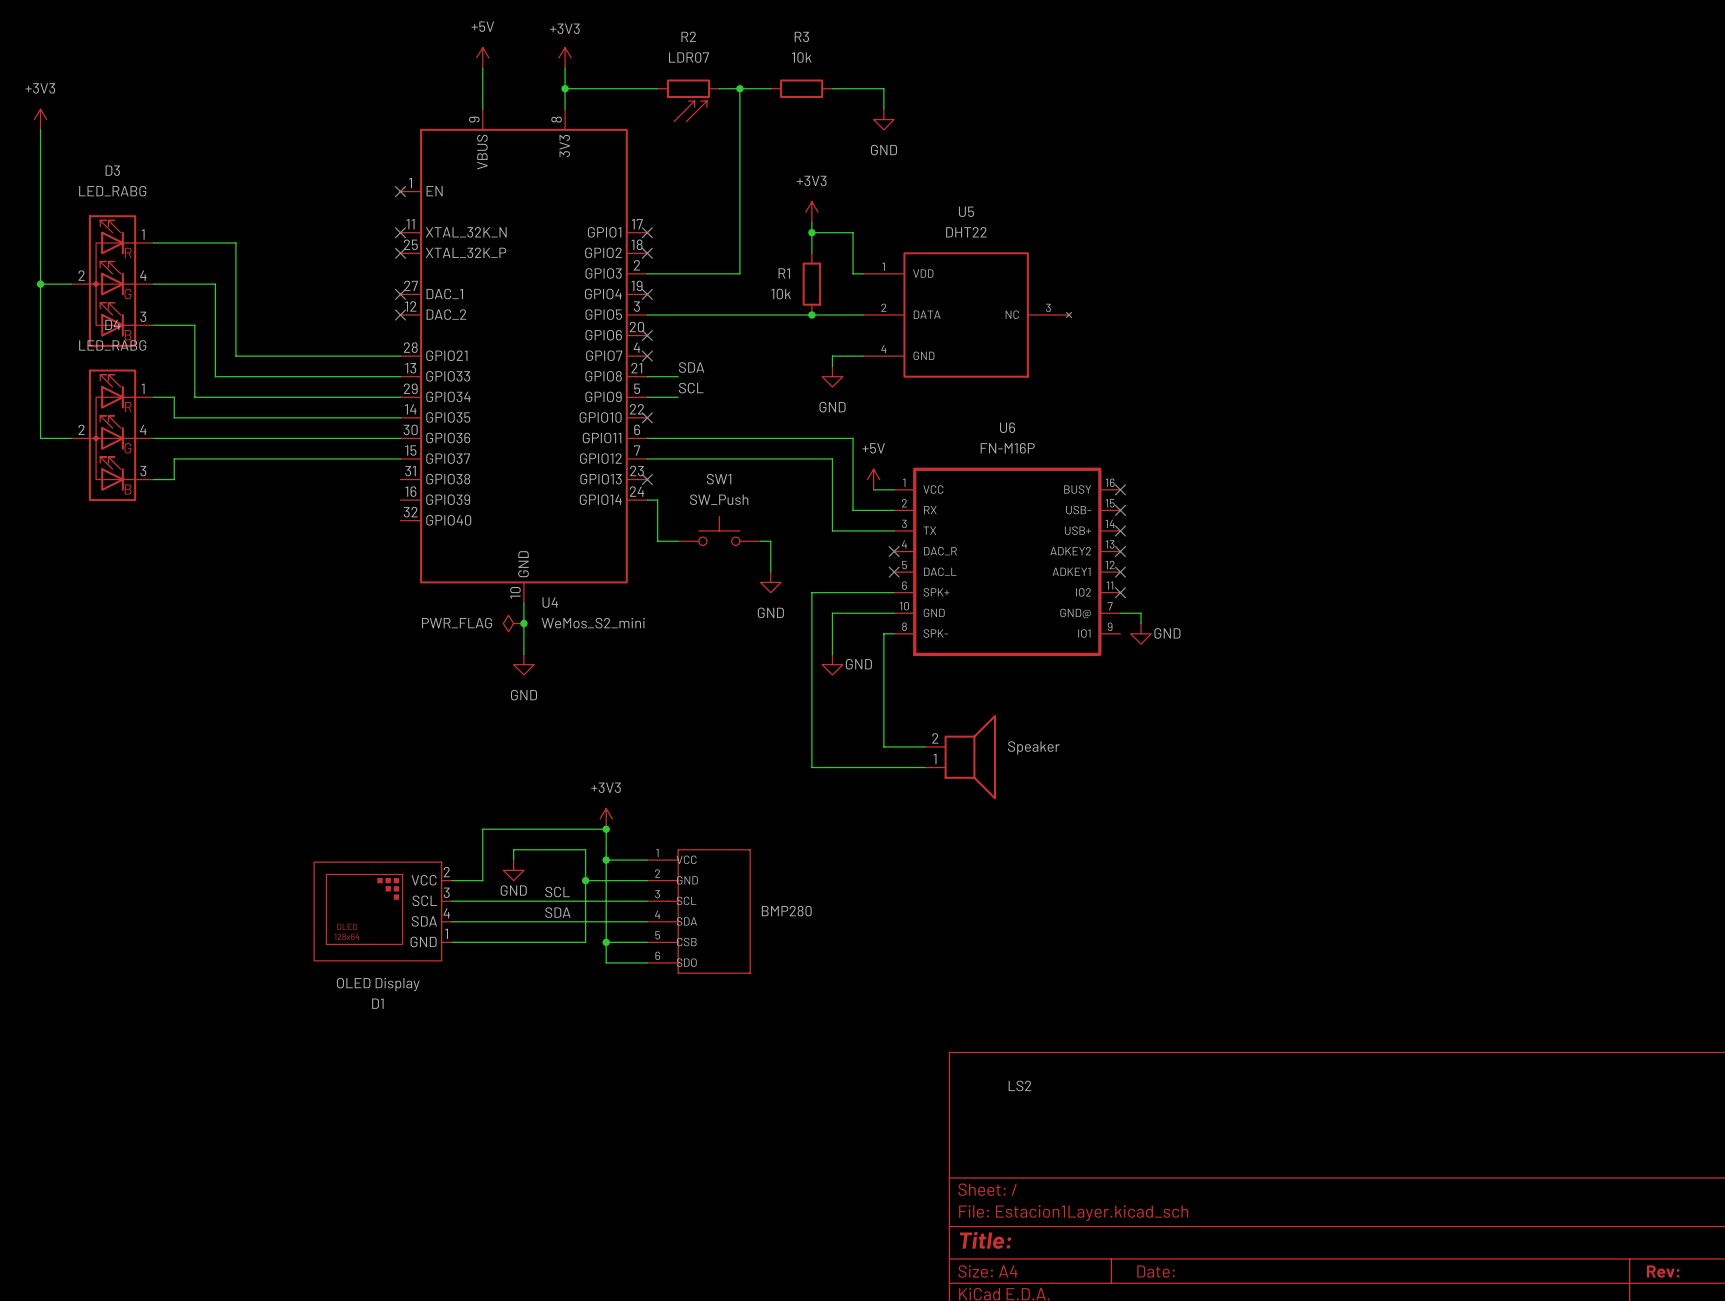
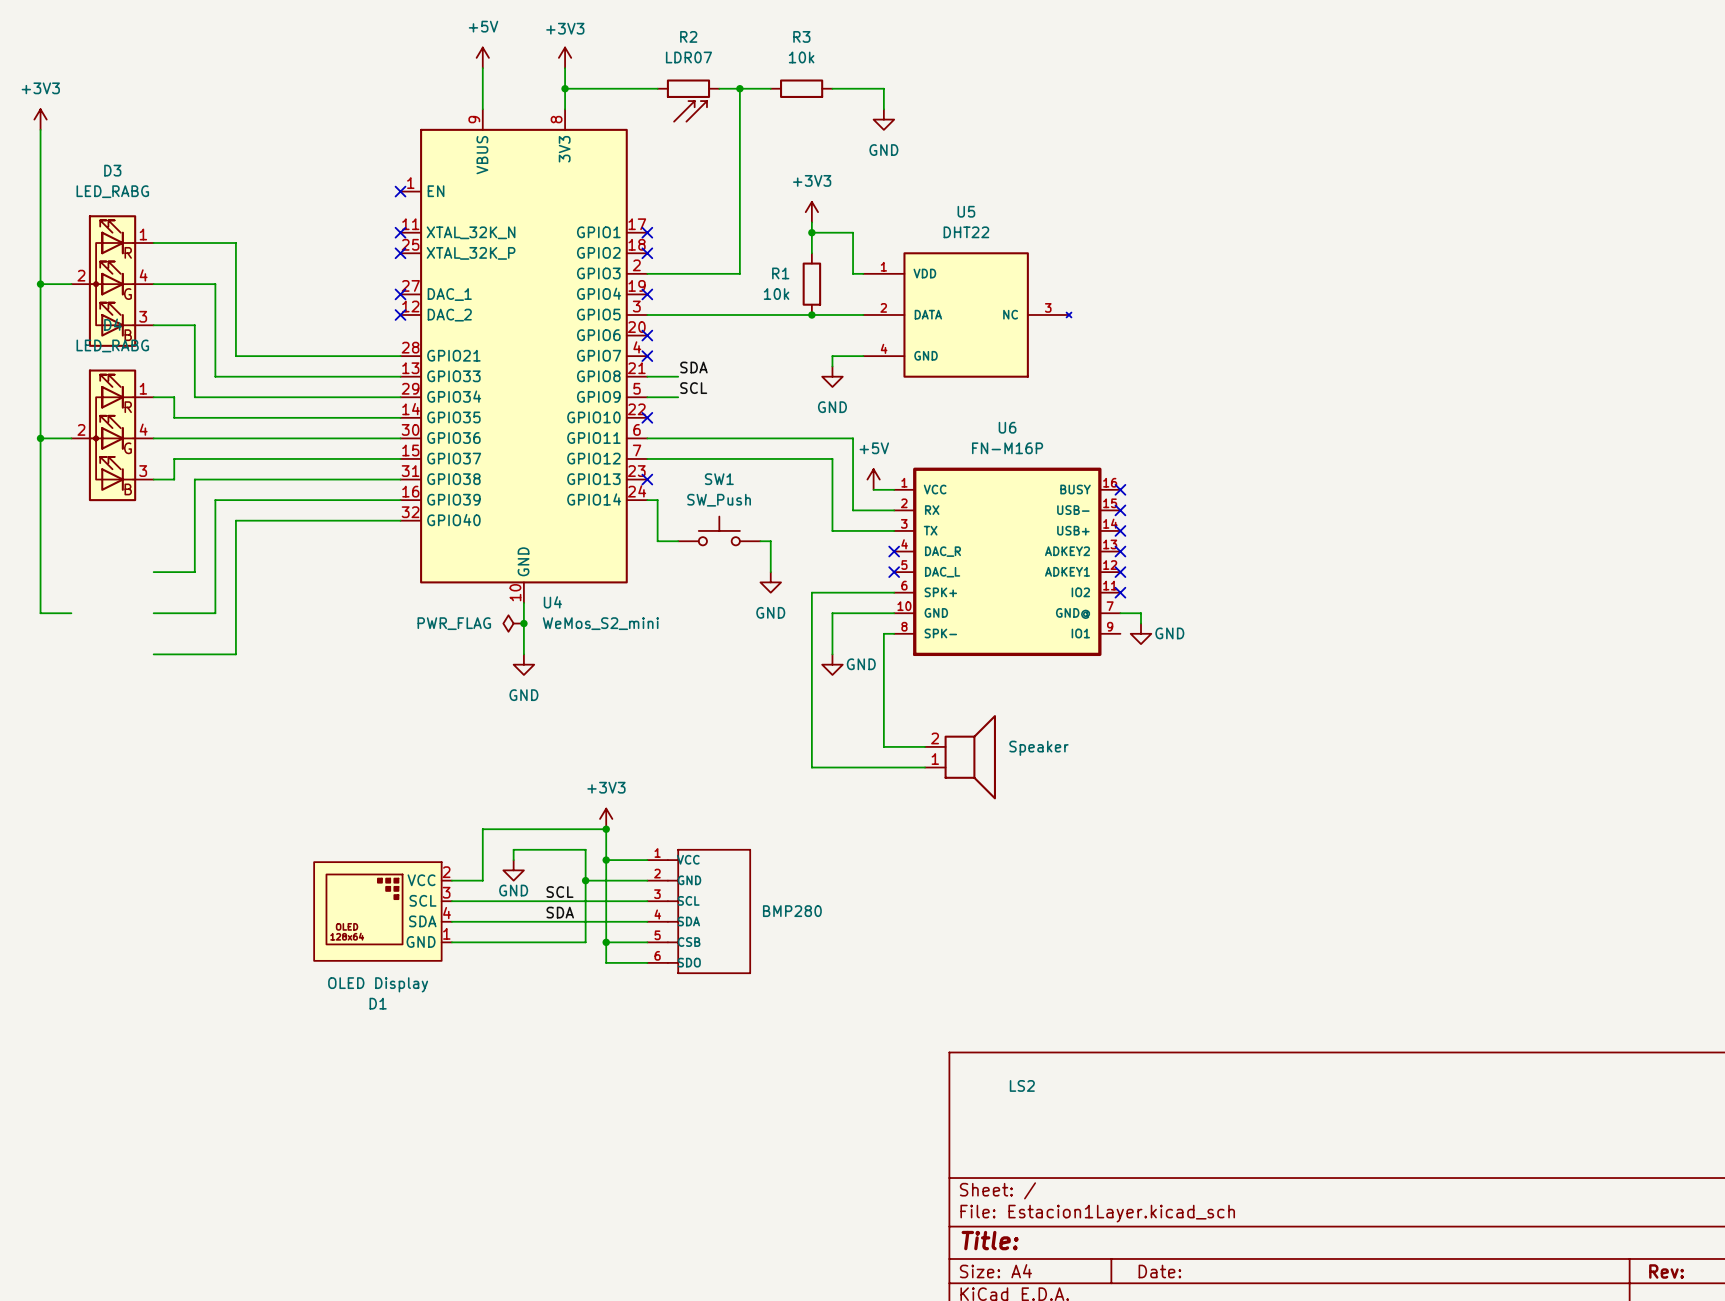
wire: none -> (40, 438) (40, 613) (71, 613)
junction: none -> (40, 438)
wire: none -> (400, 479) (194, 479) (194, 572) (153, 572)
wire: none -> (400, 500) (215, 500) (215, 613) (153, 613)
wire: none -> (400, 520) (235, 520) (235, 654) (153, 654)

